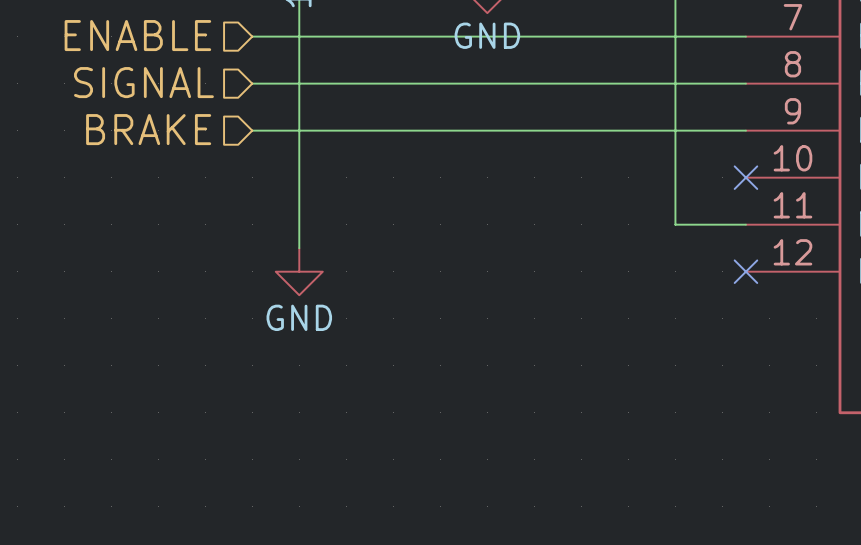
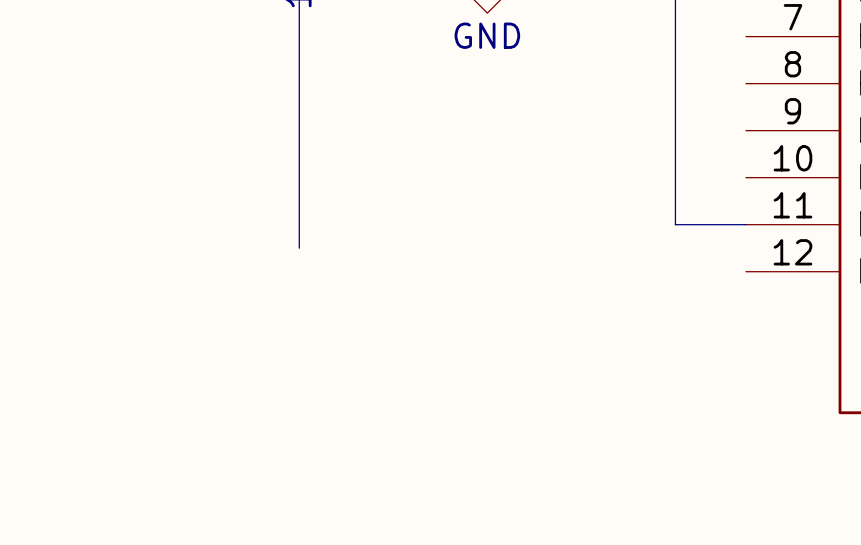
hierarchical label: ENABLE (137, 35) -> none
wire: (252, 36) (745, 36) -> none
hierarchical label: SIGNAL (143, 82) -> none
wire: (252, 83) (745, 83) -> none
hierarchical label: BRAKE (148, 129) -> none
wire: (252, 130) (745, 130) -> none
no-connect mark: (745, 177) -> none
power symbol: GND (299, 271) -> none
no-connect mark: (745, 271) -> none

